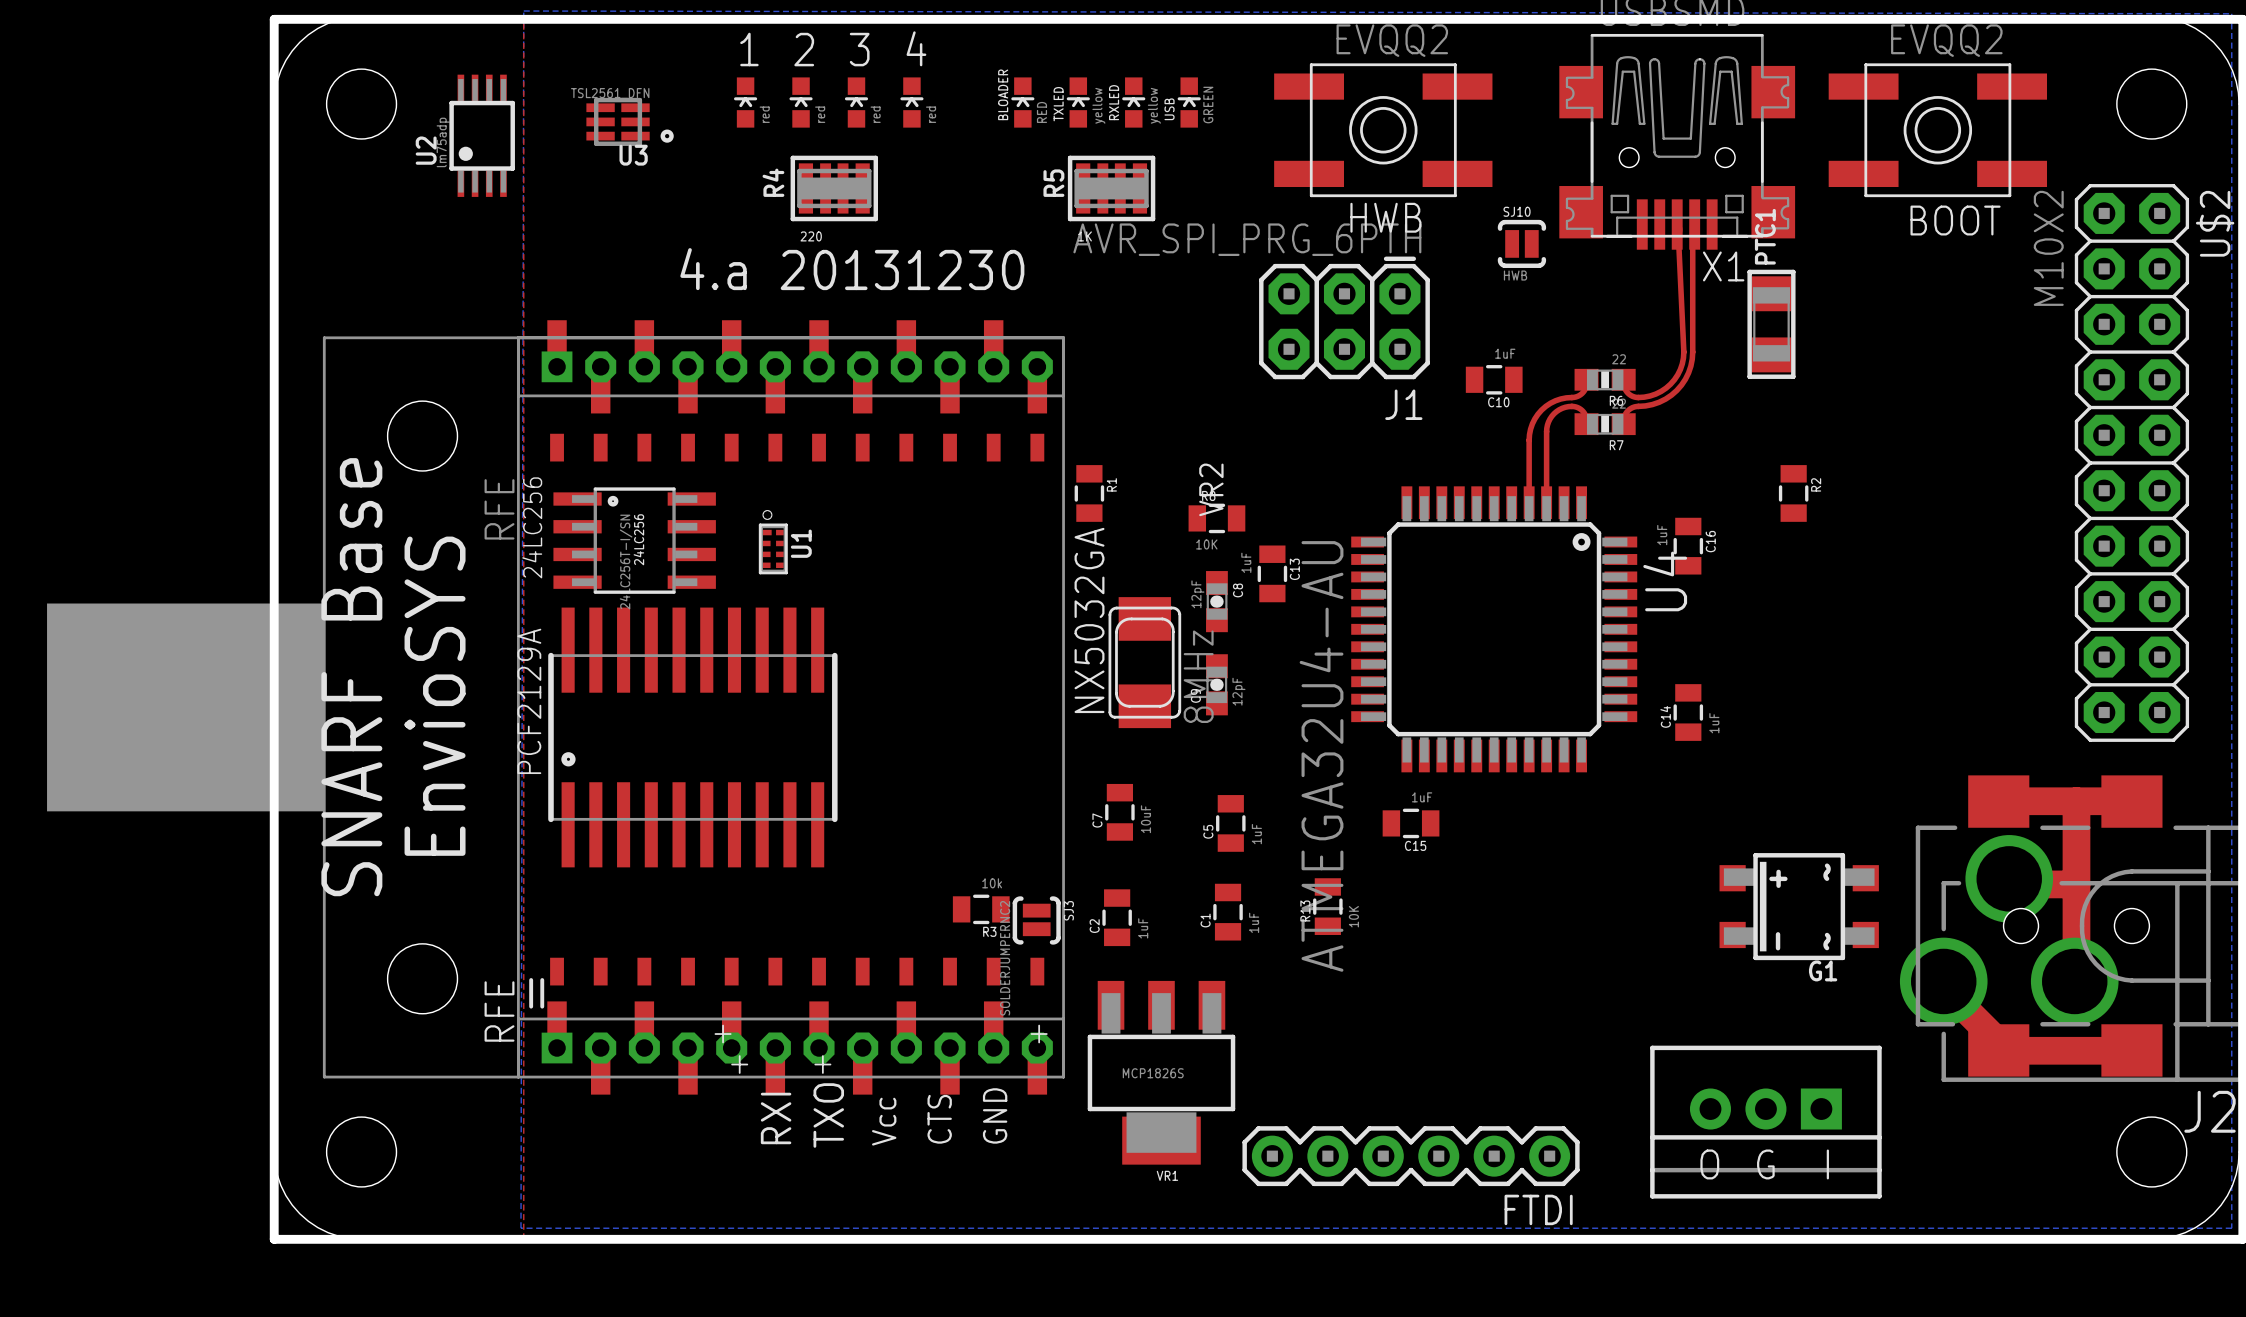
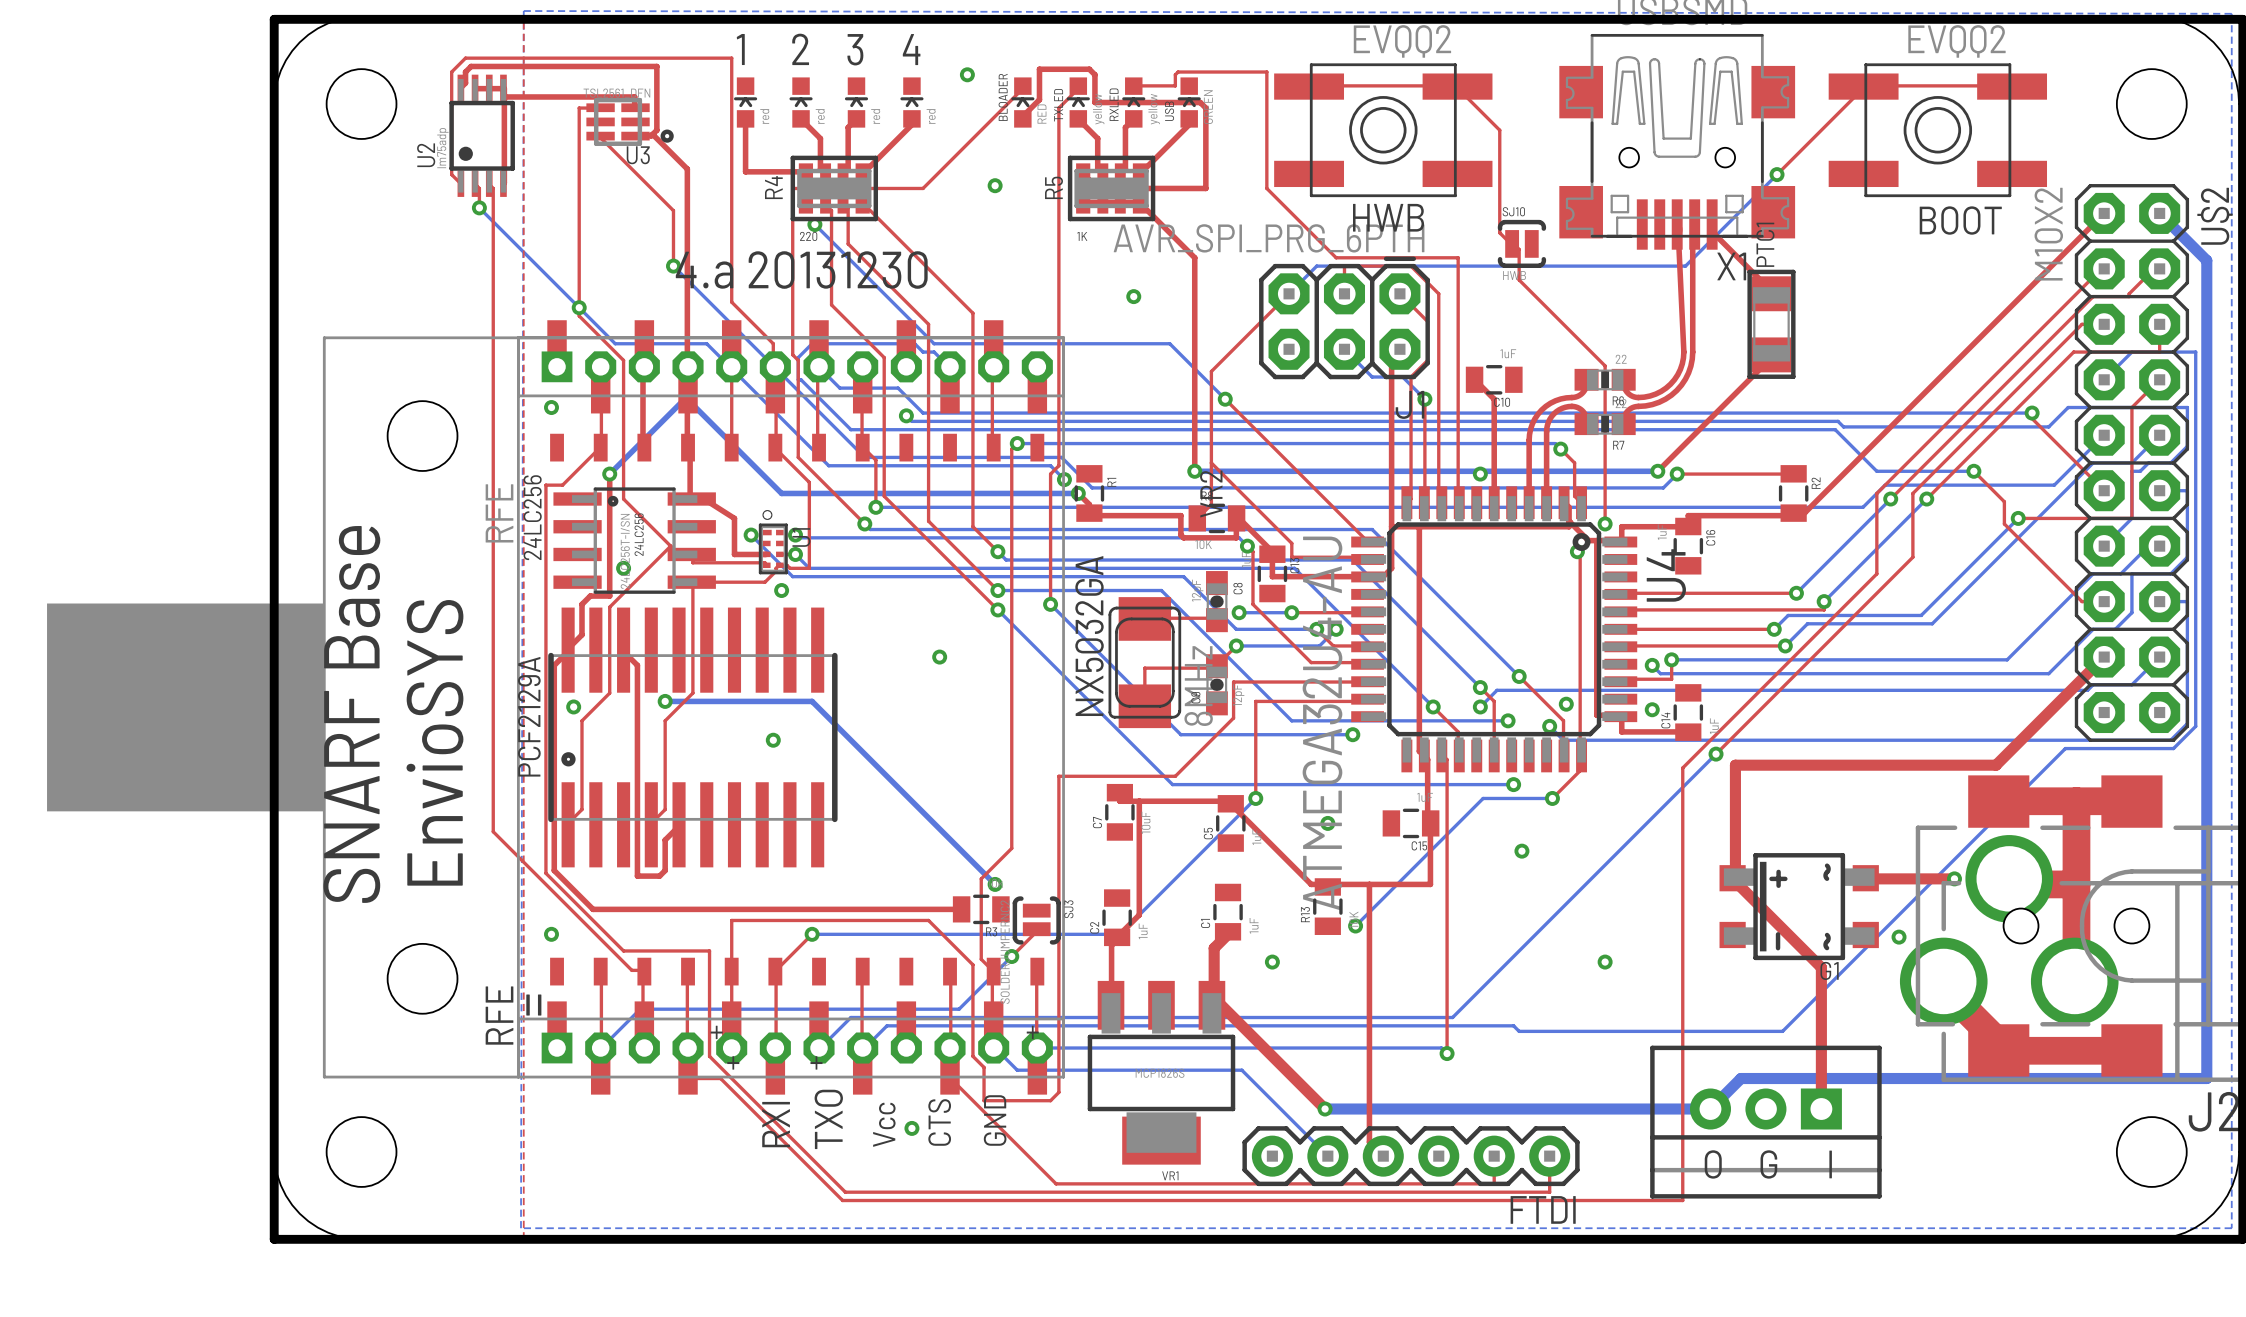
via: none -> (967, 74)
top track: none -> (1133, 85) (1175, 85) (1175, 74) (1178, 72) (1266, 72) (1266, 188) (1336, 257) (1458, 257) (1459, 502)
top track: none -> (1022, 86) (1022, 88) (923, 188) (792, 188) (792, 354) (798, 360) (798, 457) (864, 523)
top track: none -> (1078, 86) (1078, 88) (1058, 108) (1058, 465) (1050, 474) (1050, 604)
top track: none -> (1309, 86) (1455, 85) (1499, 130) (1499, 232) (1519, 249) (1519, 279) (1605, 365) (1605, 523)
top track: none -> (2012, 86) (1863, 86) (1777, 174)
top track: none -> (460, 87) (465, 83) (465, 72) (471, 66) (656, 66) (656, 130) (651, 135) (635, 136)
top track: none -> (475, 87) (503, 87)
top track: none -> (503, 87) (503, 183)
top track: none -> (503, 87) (504, 96) (634, 96) (635, 107)
top track: none -> (600, 107) (579, 108) (579, 316) (623, 360) (623, 499) (679, 554) (692, 554) (692, 562) (764, 562) (766, 565)
top track: none -> (745, 118) (745, 171) (805, 172)
top track: none -> (911, 118) (911, 124) (862, 172)
top track: none -> (1022, 118) (1022, 116) (1039, 99) (1039, 69) (1089, 69) (1094, 74) (1094, 102) (1200, 102) (1205, 108) (1205, 188) (1094, 188) (1083, 172)
top track: none -> (1189, 118) (1189, 124) (1139, 172)
top track: none -> (801, 119) (820, 138) (820, 169) (825, 172)
top track: none -> (856, 119) (848, 127) (848, 169) (843, 172)
top track: none -> (1078, 119) (1097, 138) (1097, 169) (1102, 172)
top track: none -> (1133, 119) (1125, 127) (1125, 169) (1120, 172)
top track: none -> (652, 134) (687, 169) (687, 446) (690, 449) (690, 499) (703, 499) (734, 518) (734, 554) (766, 554)
top track: none -> (600, 136) (673, 210) (673, 266)
bottom track: none -> (1777, 174) (1685, 266) (1316, 266) (1289, 293)
via: none -> (1777, 174)
top track: none -> (460, 183) (451, 174) (451, 72) (465, 58) (731, 58) (731, 302) (773, 343) (773, 365) (776, 368) (775, 447) (809, 482) (809, 568) (789, 568) (787, 565) (778, 565) (764, 582) (691, 582)
top track: none -> (475, 183) (479, 188) (479, 207)
top track: none -> (489, 183) (493, 188) (493, 831) (631, 970) (644, 971) (644, 1048)
via: none -> (995, 185)
top track: none -> (825, 204) (831, 210) (831, 304) (884, 357) (884, 496) (997, 609)
top track: none -> (843, 204) (848, 207) (848, 243) (928, 324) (928, 521) (997, 590)
top track: none -> (862, 204) (972, 313) (972, 526) (997, 551)
top track: none -> (1083, 204) (1083, 202) (1100, 202) (1102, 204) (1103, 202) (1119, 202) (1120, 204) (1122, 202) (1139, 202) (1194, 257) (1194, 471)
bottom track: none -> (479, 207) (615, 343) (706, 343) (828, 465) (1050, 465) (1064, 479)
via: none -> (479, 207)
top track: none -> (2104, 213) (1804, 512) (1793, 512) (1793, 515) (1688, 515) (1688, 526) (1621, 526) (1620, 542) (1588, 540) (1569, 521) (1569, 507) (1564, 502)
bottom track: none -> (2159, 213) (2206, 260) (2206, 1078) (1740, 1078) (1710, 1109) (1325, 1109)
bottom track: none -> (814, 224) (934, 343) (1169, 343) (1225, 399)
via: none -> (814, 224)
top track: none -> (1712, 224) (1713, 232) (1771, 291) (1771, 293)
bottom track: none -> (673, 266) (864, 457) (1061, 457) (1092, 487) (1663, 487) (1677, 474)
via: none -> (673, 266)
top track: none -> (2104, 268) (2101, 268) (1876, 493) (1876, 573) (1682, 767) (1682, 1200) (842, 1200) (720, 1078) (690, 1078) (687, 1075) (688, 971)
top track: none -> (2159, 268) (2154, 268) (2129, 293) (2129, 296) (2093, 296) (1890, 499)
top track: none -> (1289, 293) (1211, 371) (1211, 504) (1197, 518)
top track: none -> (1344, 293) (1344, 266) (1411, 266) (1438, 293) (1438, 499) (1441, 502)
top track: none -> (1399, 293) (1427, 321) (1427, 360) (1411, 377) (1411, 499) (1406, 502)
via: none -> (1133, 296)
via: none -> (579, 307)
top track: none -> (2104, 324) (2082, 324) (1912, 493) (1912, 557) (1716, 754)
top track: none -> (2159, 324) (2159, 352) (2073, 352) (1926, 499)
top track: none -> (644, 338) (644, 447)
top track: none -> (731, 338) (731, 447)
top track: none -> (819, 338) (819, 447)
top track: none -> (993, 338) (993, 447)
bottom track: none -> (1344, 349) (1372, 377) (1402, 377) (1424, 399)
top track: none -> (1399, 349) (1391, 357) (1391, 568) (1383, 576) (1272, 576) (1272, 551) (1239, 518) (1236, 518) (1236, 537) (1183, 537) (1180, 535) (1180, 515) (1089, 515) (1089, 504) (1078, 493)
top track: none -> (1771, 354) (1771, 357) (1657, 471)
top track: none -> (600, 366) (601, 446) (562, 485) (545, 485) (545, 873) (623, 950) (709, 950) (709, 1056) (845, 1192) (1549, 1192) (1549, 1156)
bottom track: none -> (688, 366) (687, 396) (609, 474)
bottom track: none -> (819, 366) (839, 388) (898, 388) (923, 413) (2032, 413)
top track: none -> (862, 366) (862, 446) (875, 460) (875, 507)
bottom track: none -> (950, 366) (934, 352) (923, 352) (914, 343) (812, 343) (798, 357) (798, 379) (801, 379) (850, 429) (1835, 429) (1876, 471) (1973, 471)
top track: none -> (1474, 379) (1494, 399) (1494, 502)
bottom track: none -> (2104, 379) (2131, 352) (2195, 352) (2195, 726) (2173, 748) (2065, 748) (1782, 1031) (1519, 1031) (1513, 1025) (886, 1025) (862, 1048)
top track: none -> (2159, 379) (2131, 407) (2131, 518) (2018, 518)
bottom track: none -> (685, 397) (781, 493) (1078, 493)
top track: none -> (1225, 399) (1367, 542)
via: none -> (1225, 399)
top track: none -> (1424, 399) (1424, 502)
via: none -> (1424, 399)
via: none -> (551, 407)
top track: none -> (2032, 413) (2032, 418) (2104, 490)
via: none -> (2032, 413)
bottom track: none -> (906, 415) (911, 421) (1838, 421) (1843, 426) (2048, 426) (2068, 407) (2187, 407) (2187, 446) (2170, 462) (2148, 462) (2140, 471) (2131, 471) (2131, 518) (2104, 546)
via: none -> (906, 415)
bottom track: none -> (2104, 435) (2054, 485) (1885, 485) (1862, 507) (875, 507)
bottom track: none -> (2159, 435) (2131, 462) (2093, 462) (1932, 623) (1807, 623) (1785, 645)
top track: none -> (1017, 443) (1011, 449) (1011, 848) (981, 878) (981, 959) (993, 971) (993, 1048)
bottom track: none -> (1017, 443) (1555, 443) (1560, 449)
via: none -> (1017, 443)
top track: none -> (1560, 449) (1574, 462) (1574, 496) (1581, 502)
via: none -> (1560, 449)
top track: none -> (1211, 462) (1291, 543) (1291, 557) (1366, 557) (1367, 559)
bottom track: none -> (1194, 471) (1480, 471) (1480, 474) (1483, 471) (1657, 471)
via: none -> (1194, 471)
via: none -> (1657, 471)
top track: none -> (1973, 471) (2004, 501) (2004, 523) (2082, 601) (2104, 601)
via: none -> (1973, 471)
top track: none -> (609, 474) (609, 596) (590, 596) (581, 604) (581, 634) (554, 665) (554, 870) (593, 909) (961, 909)
via: none -> (609, 474)
via: none -> (1480, 474)
top track: none -> (1677, 474) (1793, 474)
via: none -> (1677, 474)
via: none -> (1064, 479)
bottom track: none -> (2159, 490) (2187, 490) (2187, 557) (2170, 573) (2131, 573) (2131, 612) (2115, 629) (2093, 629) (2048, 673) (1660, 673) (1652, 665)
via: none -> (1078, 493)
bottom track: none -> (1890, 499) (1796, 593)
via: none -> (1890, 499)
bottom track: none -> (1926, 499) (1824, 601)
via: none -> (1926, 499)
via: none -> (875, 507)
bottom track: none -> (2018, 518) (1921, 615) (1788, 615) (1774, 629)
via: none -> (2018, 518)
top track: none -> (1570, 522) (1569, 526) (1391, 526)
bottom track: none -> (864, 523) (870, 529) (1372, 529) (1519, 676)
via: none -> (864, 523)
via: none -> (1605, 523)
top track: none -> (1419, 526) (1419, 751) (1427, 759) (1430, 884) (1311, 884) (1230, 804) (1230, 801) (1119, 801) (1119, 792)
bottom track: none -> (751, 535) (792, 576) (1183, 576) (1236, 629) (1316, 629)
via: none -> (751, 535)
bottom track: none -> (795, 535) (798, 537) (1239, 537) (1247, 546)
via: none -> (795, 535)
top track: none -> (1596, 540) (1596, 715) (1618, 715) (1621, 718) (1621, 731) (1688, 731)
top track: none -> (670, 546) (609, 607) (609, 693) (581, 720) (581, 809) (568, 824)
top track: none -> (1247, 546) (1252, 551) (1252, 604) (1311, 662) (1366, 662) (1367, 664)
via: none -> (1247, 546)
bottom track: none -> (2159, 546) (2148, 546) (2120, 573) (2093, 573) (2007, 659) (1671, 659)
bottom track: none -> (997, 551) (1006, 560) (1352, 560) (1480, 687)
via: none -> (997, 551)
top track: none -> (1577, 551) (1580, 554) (1580, 770) (1552, 798)
via: none -> (1577, 551)
bottom track: none -> (795, 554) (809, 568) (1294, 568) (1433, 706)
via: none -> (795, 554)
via: none -> (623, 568)
top track: none -> (692, 582) (692, 693) (665, 720) (665, 809) (651, 824)
via: none -> (781, 590)
bottom track: none -> (997, 590) (1161, 590) (1291, 720) (1508, 720)
via: none -> (997, 590)
top track: none -> (1796, 593) (1620, 594)
via: none -> (1796, 593)
top track: none -> (1824, 601) (1824, 609) (1621, 609) (1620, 611)
via: none -> (1824, 601)
bottom track: none -> (2159, 601) (2187, 601) (2187, 723) (2170, 740) (1563, 740) (1549, 726)
bottom track: none -> (1050, 604) (1180, 734) (1352, 734)
via: none -> (1050, 604)
bottom track: none -> (997, 609) (1172, 784) (1513, 784)
via: none -> (997, 609)
top track: none -> (1367, 611) (1291, 612)
bottom track: none -> (1239, 612) (1291, 612)
via: none -> (1239, 612)
via: none -> (1291, 612)
top track: none -> (1216, 618) (1144, 618)
top track: none -> (1316, 629) (1333, 645) (1367, 646)
via: none -> (1316, 629)
bottom track: none -> (1336, 629) (1319, 645) (1236, 645)
via: none -> (1336, 629)
top track: none -> (1620, 629) (1774, 629)
via: none -> (1774, 629)
top track: none -> (1236, 645) (1216, 665) (1216, 668) (1144, 668) (1144, 706)
via: none -> (1236, 645)
top track: none -> (1785, 645) (1620, 646)
via: none -> (1785, 645)
top track: none -> (623, 650) (637, 665) (637, 876) (659, 876) (665, 870) (665, 840) (679, 824)
via: none -> (939, 657)
top track: none -> (2104, 657) (1996, 765) (1735, 765) (1735, 873) (1732, 878) (1821, 967) (1821, 1109)
bottom track: none -> (2159, 657) (2131, 684) (2093, 684) (2087, 690) (1496, 690) (1480, 706)
top track: none -> (1671, 659) (1671, 679) (1621, 679) (1620, 681)
via: none -> (1671, 659)
via: none -> (1652, 665)
top track: none -> (1519, 676) (1563, 720) (1564, 755)
via: none -> (1519, 676)
top track: none -> (1367, 681) (1233, 682) (1233, 718) (1175, 776) (1058, 776) (1058, 1092) (1050, 1100) (984, 1100) (984, 1067) (972, 1056) (972, 964) (928, 920) (731, 920) (731, 1048)
top track: none -> (1480, 687) (1494, 701) (1494, 755)
via: none -> (1480, 687)
top track: none -> (1367, 699) (1366, 701) (1255, 701) (1255, 798)
bottom track: none -> (665, 701) (812, 701) (995, 884)
via: none -> (665, 701)
via: none -> (1566, 704)
via: none -> (573, 706)
top track: none -> (1433, 706) (1458, 731) (1459, 755)
via: none -> (1433, 706)
via: none -> (1480, 706)
via: none -> (1652, 709)
via: none -> (1508, 720)
via: none -> (1549, 726)
via: none -> (1352, 734)
via: none -> (773, 740)
bottom track: none -> (1716, 754) (1452, 1017) (850, 1017) (819, 1048)
via: none -> (1716, 754)
top track: none -> (1441, 755) (1447, 759) (1447, 1053)
via: none -> (1513, 784)
bottom track: none -> (1255, 798) (1119, 934) (812, 934)
via: none -> (1255, 798)
bottom track: none -> (1552, 798) (1483, 798) (1355, 926)
via: none -> (1552, 798)
top track: none -> (1139, 801) (1139, 914) (1111, 945) (1111, 1005)
via: none -> (1327, 823)
via: none -> (1521, 851)
top track: none -> (1865, 878) (1954, 878)
via: none -> (1954, 878)
via: none -> (995, 884)
top track: none -> (1369, 884) (1369, 1142) (1383, 1156)
via: none -> (1355, 926)
top track: none -> (1036, 929) (1036, 931) (1011, 956)
top track: none -> (1228, 931) (1228, 934) (1214, 948) (1214, 1003) (1211, 1005) (1219, 1003) (1325, 1109)
via: none -> (551, 934)
top track: none -> (812, 934) (775, 971) (775, 1076)
via: none -> (812, 934)
via: none -> (1899, 937)
bottom track: none -> (1011, 956) (959, 1009) (640, 1009) (600, 1048)
via: none -> (1011, 956)
via: none -> (1272, 962)
via: none -> (1605, 962)
top track: none -> (600, 971) (600, 1076)
top track: none -> (862, 971) (862, 1076)
top track: none -> (950, 971) (950, 1078) (1056, 1183) (1494, 1183) (1494, 1156)
top track: none -> (1037, 971) (1037, 1076)
bottom track: none -> (993, 1048) (1017, 1070) (1241, 1070) (1327, 1156)
bottom track: none -> (1037, 1048) (1441, 1048) (1447, 1053)
via: none -> (1447, 1053)
via: none -> (1325, 1109)
via: none -> (911, 1128)

